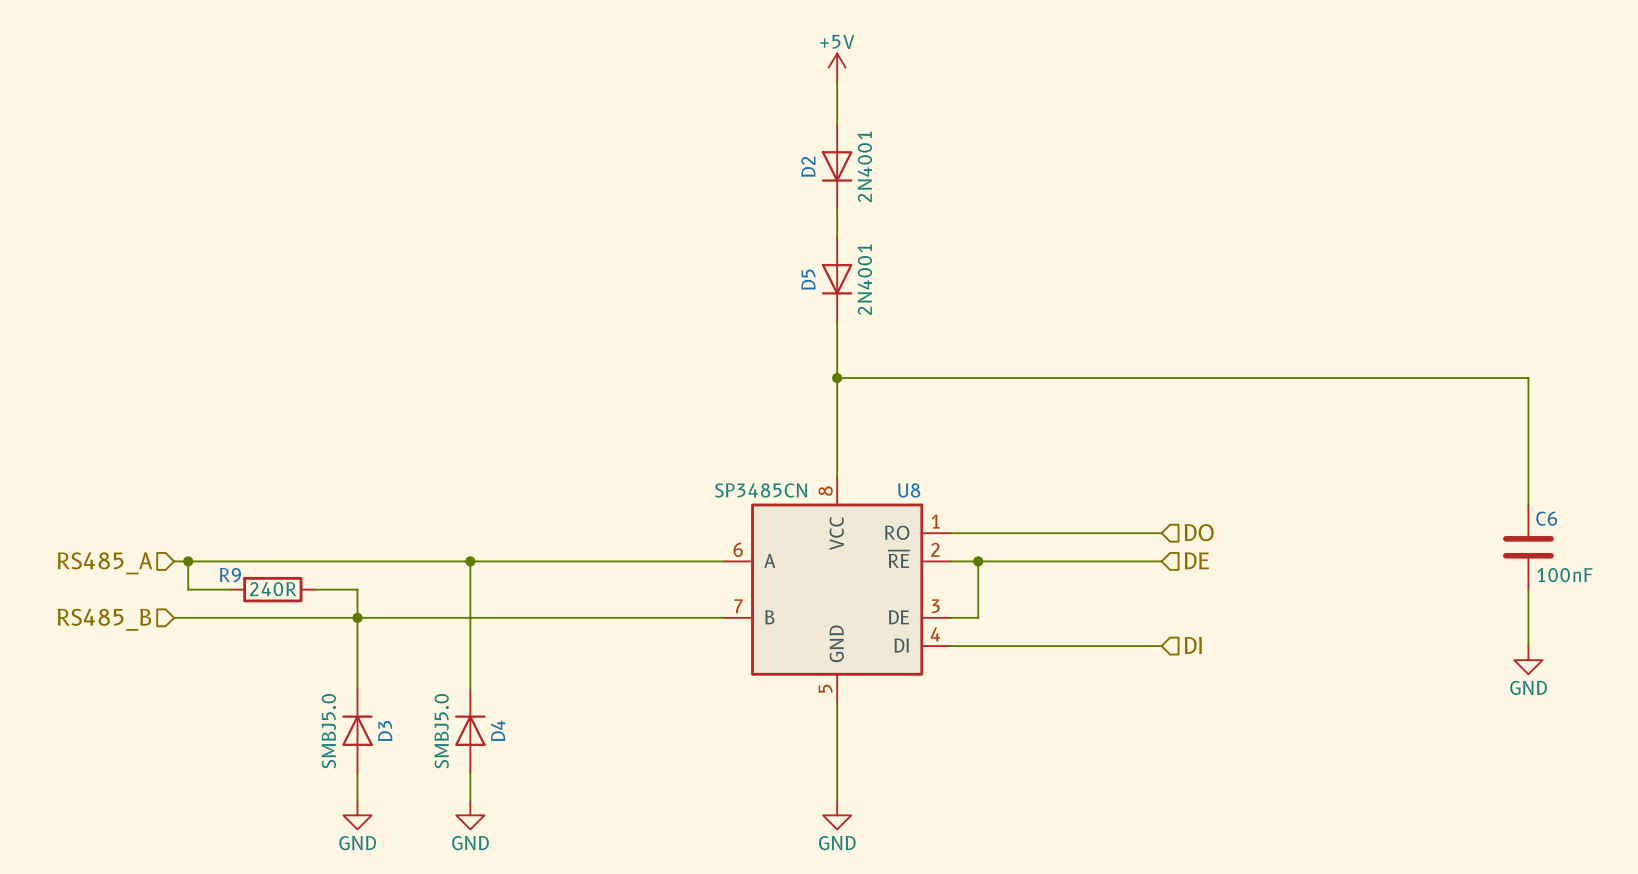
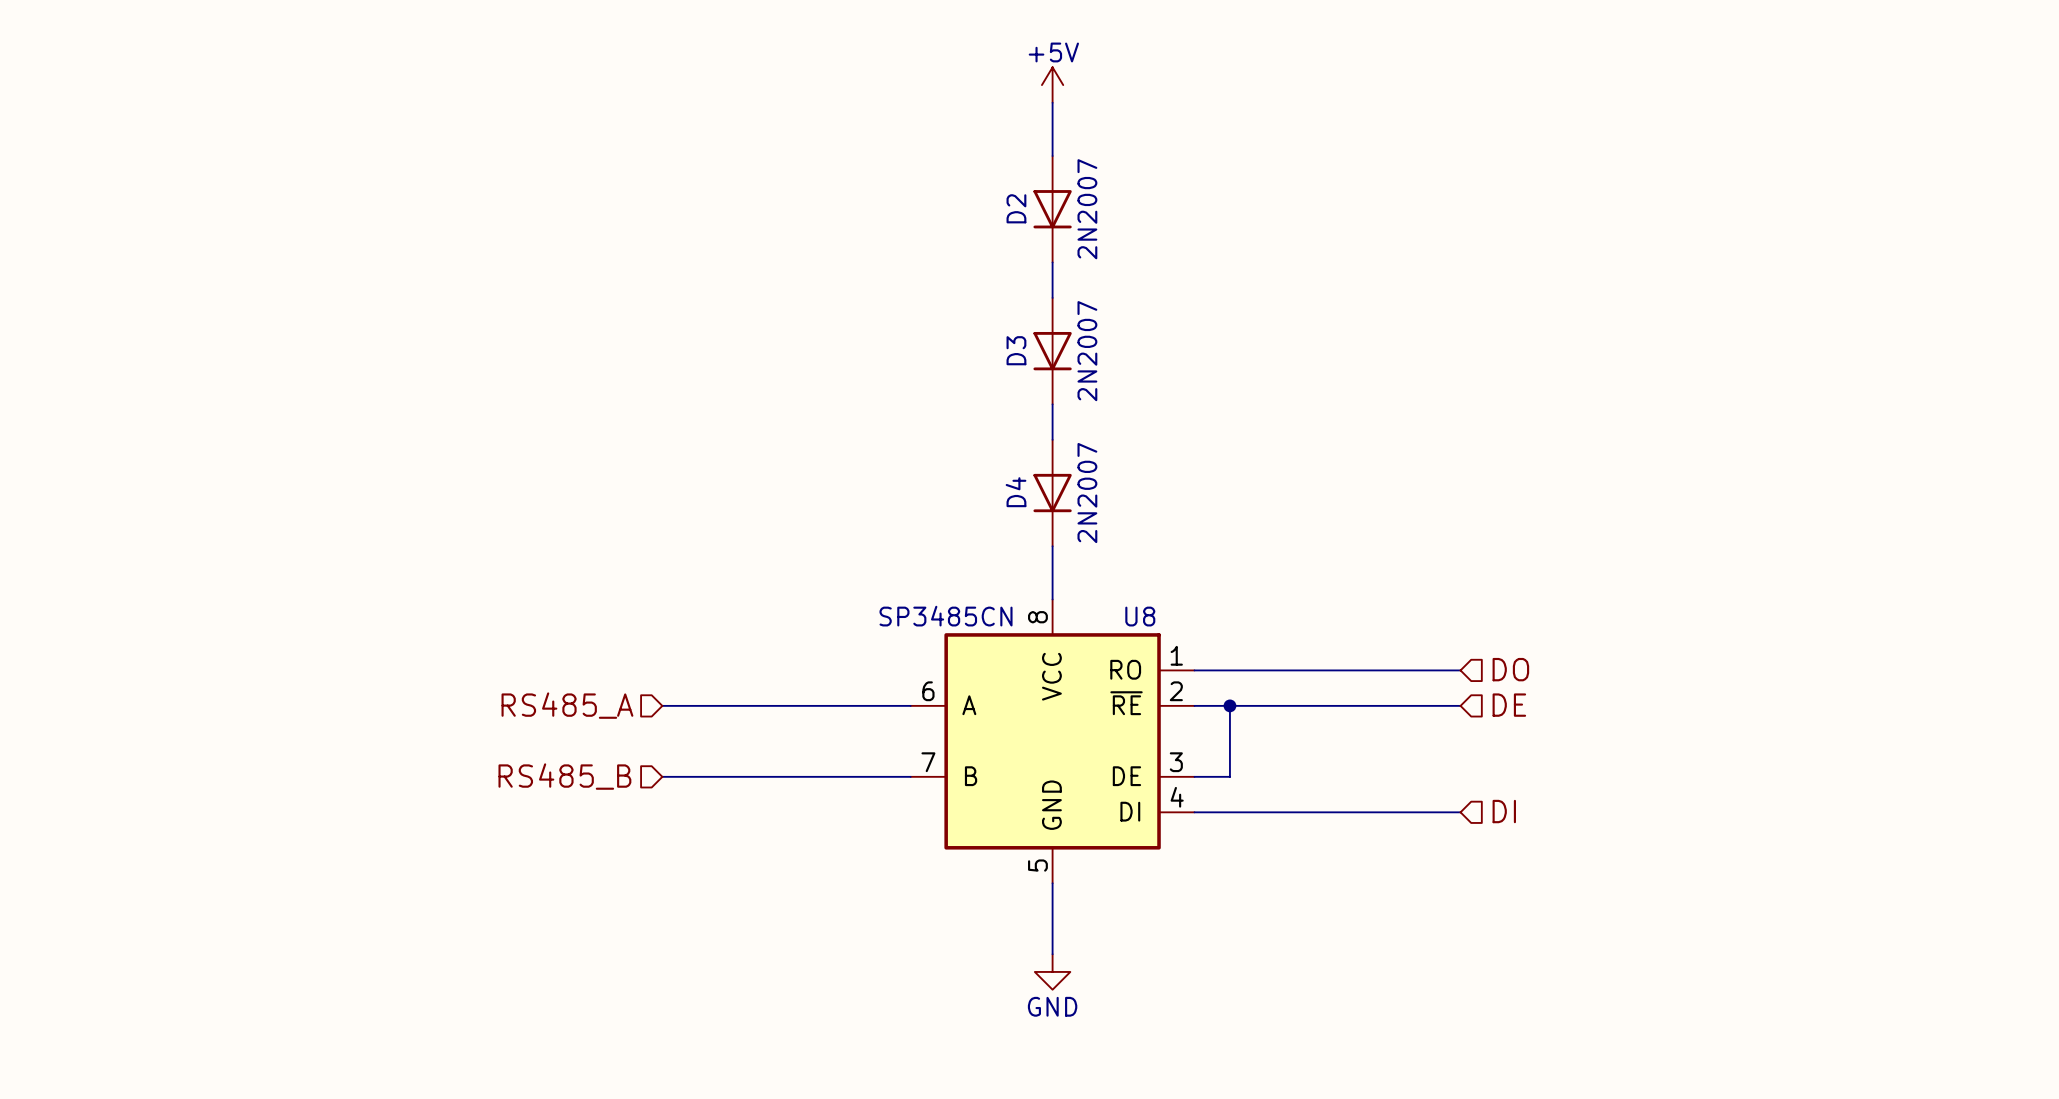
D2 value: 2N4001 (864, 166) -> 2N2007 (1087, 209)
D5 name: D5 (808, 279) -> D3 (1016, 350)
D5 value: 2N4001 (864, 279) -> 2N2007 (1087, 351)
wire: (837, 378) (1528, 378) (1528, 504) -> none
junction: (837, 378) -> none
C6: 100nF (1528, 547) -> none
wire: (174, 561) (526, 561) -> none
wire: (188, 561) (188, 589) (230, 589) -> none
junction: (188, 561) -> none
wire: (470, 561) (470, 688) -> none
junction: (470, 561) -> none
hierarchical label: RS485_A (104, 563) -> none
hierarchical label: none -> RS485_A (567, 705)
R9: 240R (272, 589) -> none
wire: (315, 589) (357, 589) (357, 688) -> none
wire: (1528, 589) (1528, 646) -> none
wire: (174, 617) (526, 617) -> none
junction: (357, 617) -> none
hierarchical label: RS485_B (104, 619) -> none
hierarchical label: none -> RS485_B (564, 776)
power symbol: GND (1528, 660) -> none
D3: SMBJ5.0 (357, 730) -> none
D4 rotation: 0° (470, 730) -> 180° (1052, 493)
D4 position: (470, 730) -> (1052, 493)
D4 value: SMBJ5.0 (441, 731) -> 2N2007 (1087, 493)
wire: (837, 758) (837, 801) -> none
wire: (357, 773) (357, 801) -> none
wire: (470, 773) (470, 801) -> none
power symbol: GND (357, 815) -> none
power symbol: GND (470, 815) -> none
power symbol position: GND (837, 815) -> GND (1052, 971)

